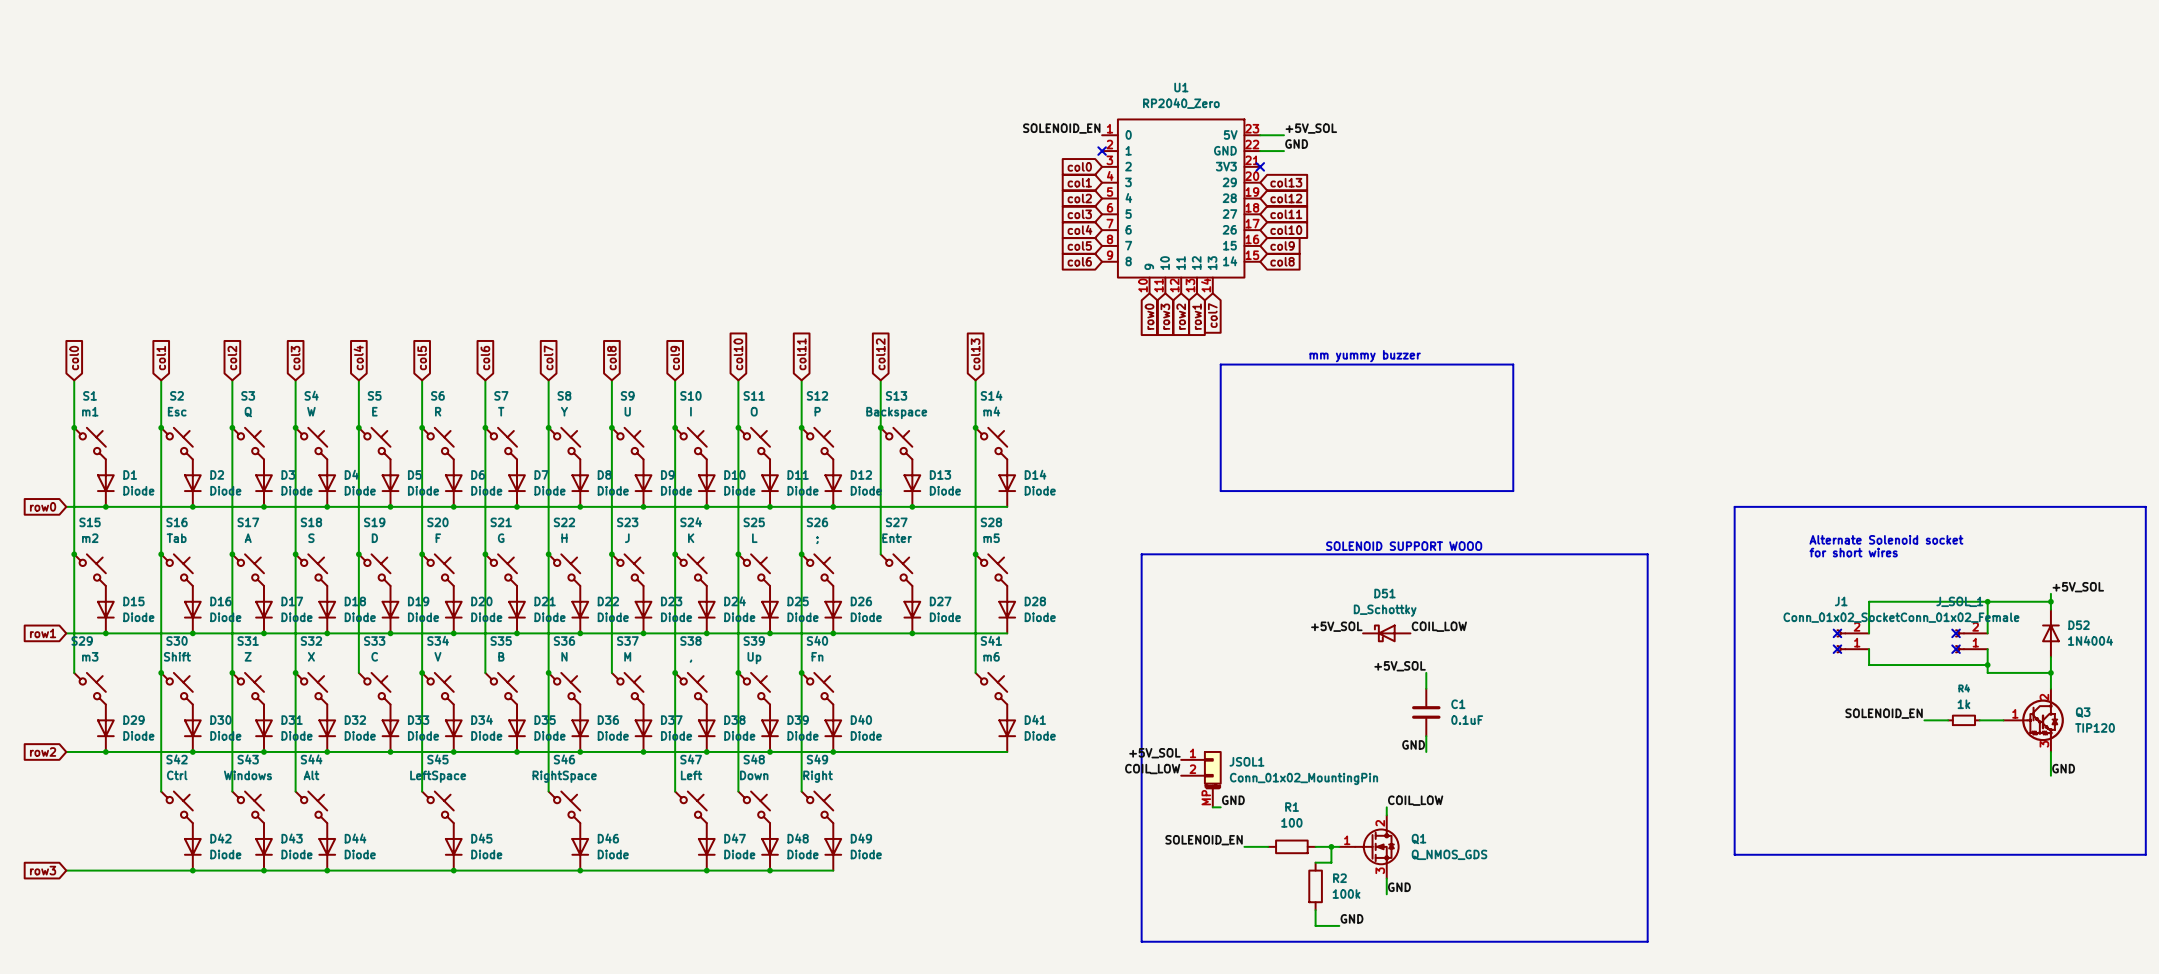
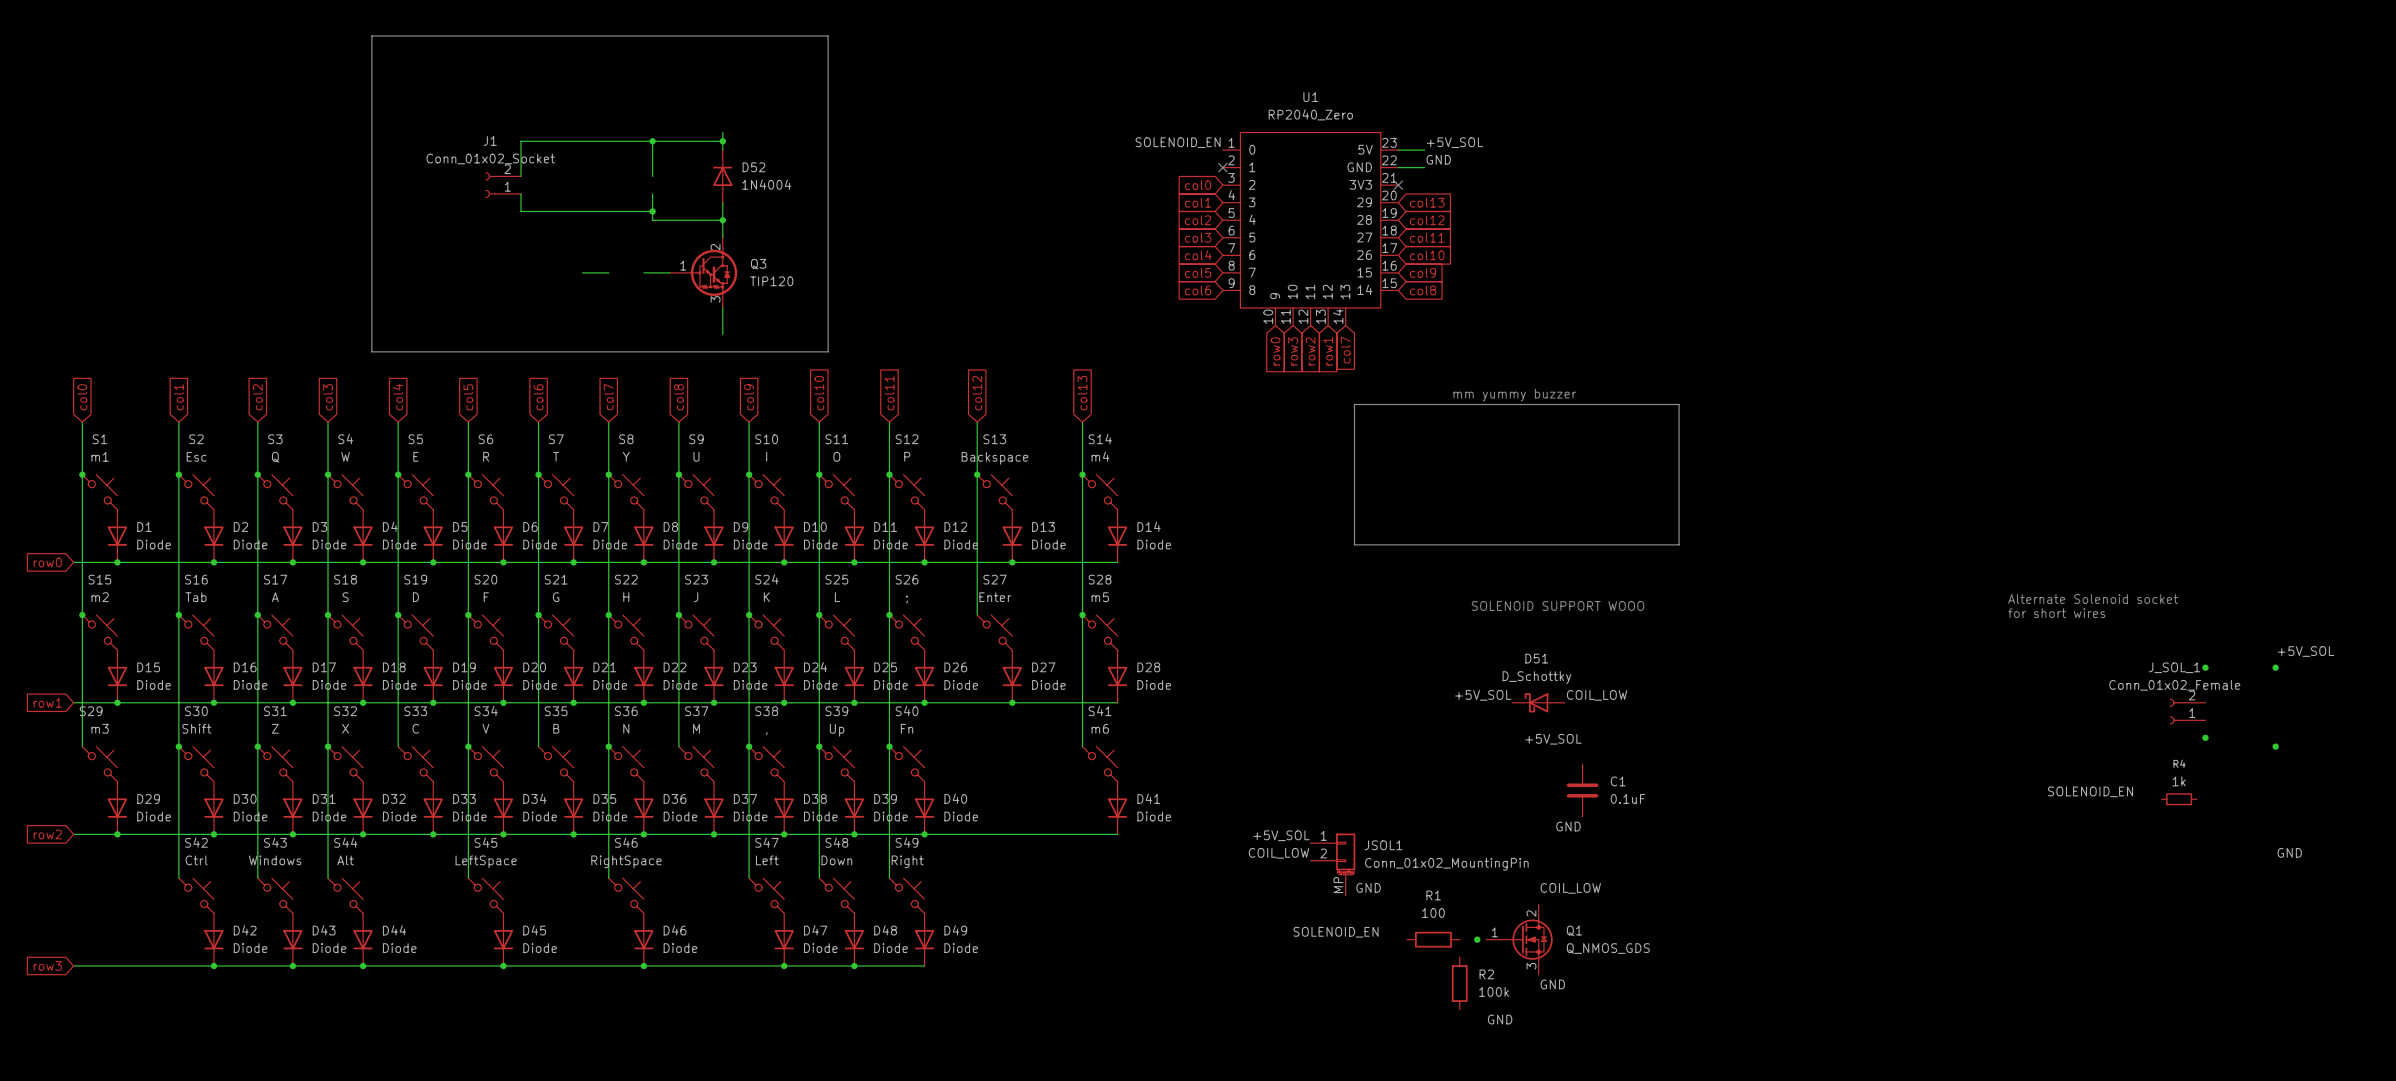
line: none -> (371, 36) (828, 36) (828, 351) (371, 351) (371, 36)
wire: none -> (722, 132) (722, 150)
wire: none -> (652, 141) (652, 176)
junction: none -> (652, 141)
wire: none -> (722, 141) (521, 141) (521, 176)
junction: none -> (722, 141)
wire: none -> (521, 193) (521, 211) (652, 211)
wire: none -> (652, 193) (652, 220) (722, 220)
wire: none -> (722, 202) (722, 237)
junction: none -> (652, 211)
junction: none -> (722, 220)
wire: none -> (582, 272) (608, 272)
wire: none -> (643, 272) (670, 272)
wire: none -> (722, 307) (722, 334)
line: (1734, 506) (2145, 506) (2145, 854) (1734, 854) (1734, 506) -> none
line: (1141, 554) (1647, 554) (1647, 941) (1141, 941) (1141, 554) -> none
wire: (2050, 593) (2050, 609) -> none
wire: (1987, 601) (1987, 633) -> none
wire: (2050, 601) (1869, 601) (1869, 633) -> none
no-connect mark: (1837, 633) -> none
no-connect mark: (1956, 633) -> none
D52 position: (2050, 633) -> (722, 176)
J1 position: (1853, 641) -> (503, 185)
no-connect mark: (1837, 649) -> none
wire: (1869, 649) (1869, 665) (1987, 665) -> none
no-connect mark: (1956, 649) -> none
wire: (1987, 649) (1987, 672) (2050, 672) -> none
wire: (2050, 657) (2050, 688) -> none
wire: (1426, 672) (1426, 688) -> none
wire: (1924, 720) (1948, 720) -> none
wire: (1979, 720) (2003, 720) -> none
Q3 position: (2033, 720) -> (703, 272)
wire: (1426, 736) (1426, 751) -> none
wire: (2050, 751) (2050, 775) -> none
wire: (1212, 807) (1220, 807) -> none
wire: (1386, 807) (1386, 815) -> none
wire: (1244, 846) (1268, 846) -> none
wire: (1315, 846) (1339, 846) -> none
wire: (1331, 846) (1331, 862) (1315, 862) -> none
wire: (1386, 878) (1386, 894) -> none
wire: (1315, 910) (1315, 925) (1339, 925) -> none

